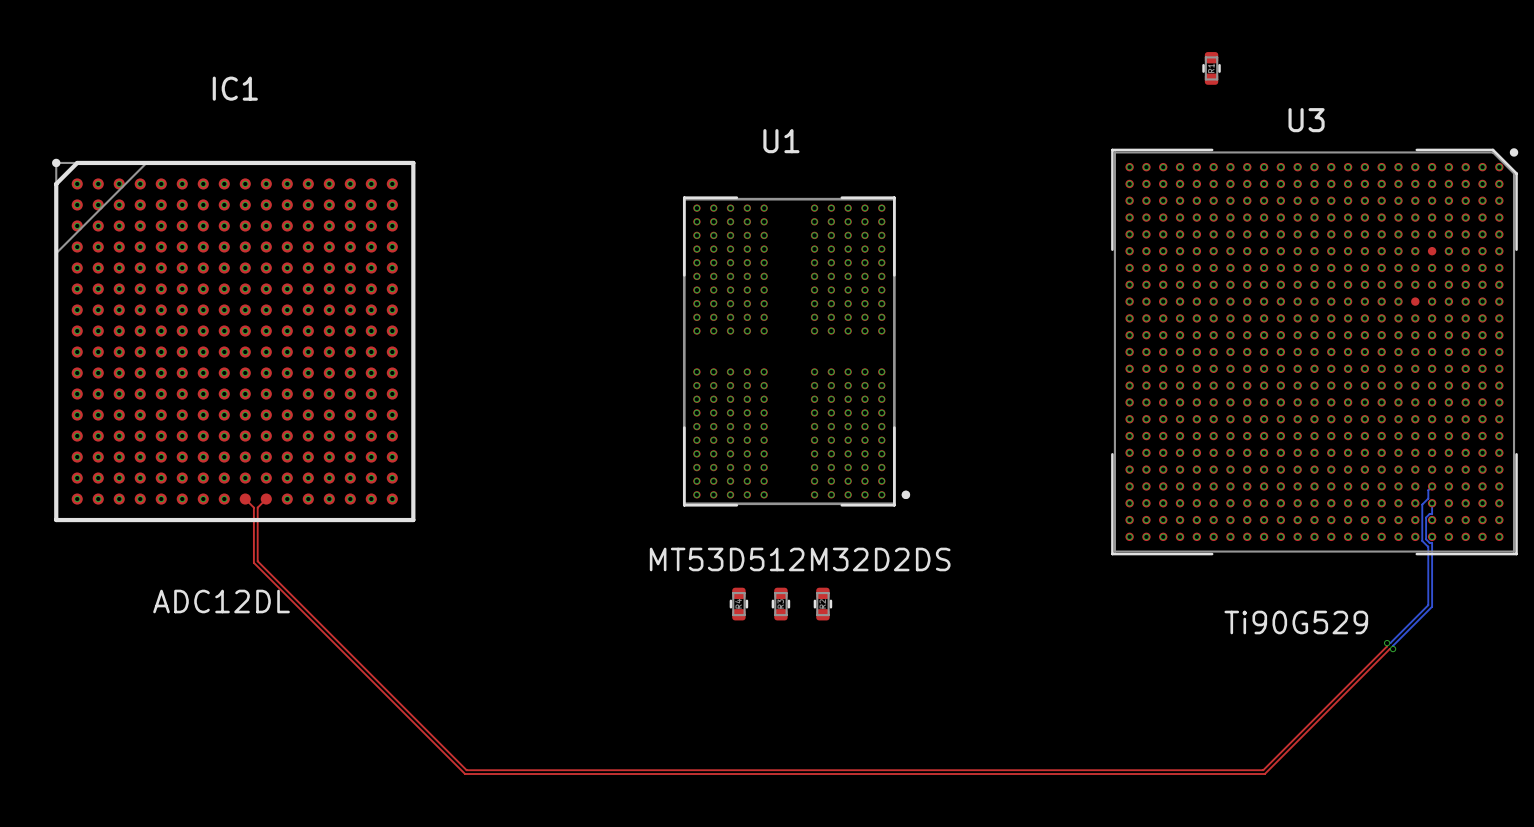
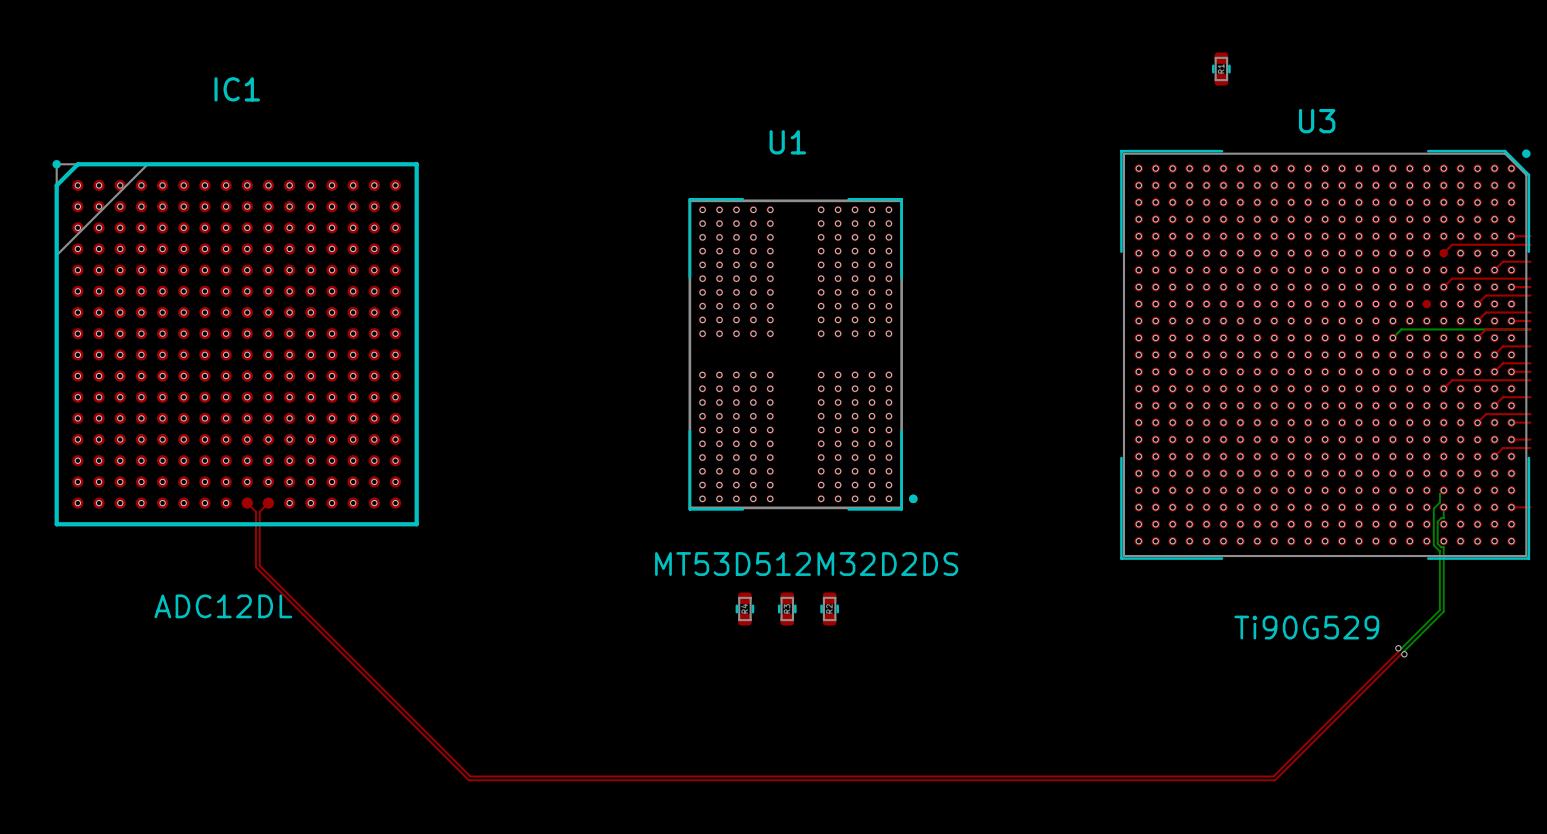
top track: none -> (1511, 236) (1530, 236)
top track: none -> (1530, 244) (1452, 244) (1443, 253)
top track: none -> (1530, 261) (1503, 261) (1494, 270)
top track: none -> (1530, 278) (1452, 278) (1443, 287)
top track: none -> (1511, 287) (1530, 287)
top track: none -> (1530, 295) (1486, 295) (1477, 304)
top track: none -> (1530, 312) (1486, 312) (1477, 320)
top track: none -> (1511, 320) (1530, 320)
top track: none -> (1530, 329) (1486, 329) (1477, 337)
bottom track: none -> (1530, 329) (1401, 329) (1392, 337)
top track: none -> (1530, 346) (1503, 346) (1494, 354)
top track: none -> (1530, 363) (1503, 363) (1494, 371)
top track: none -> (1511, 371) (1530, 371)
top track: none -> (1530, 380) (1452, 380) (1443, 388)
top track: none -> (1530, 397) (1503, 397) (1494, 405)
top track: none -> (1530, 414) (1486, 414) (1477, 422)
top track: none -> (1511, 422) (1530, 422)
top track: none -> (1511, 439) (1530, 439)
top track: none -> (1530, 448) (1503, 448) (1494, 456)
top track: none -> (1511, 507) (1530, 507)

